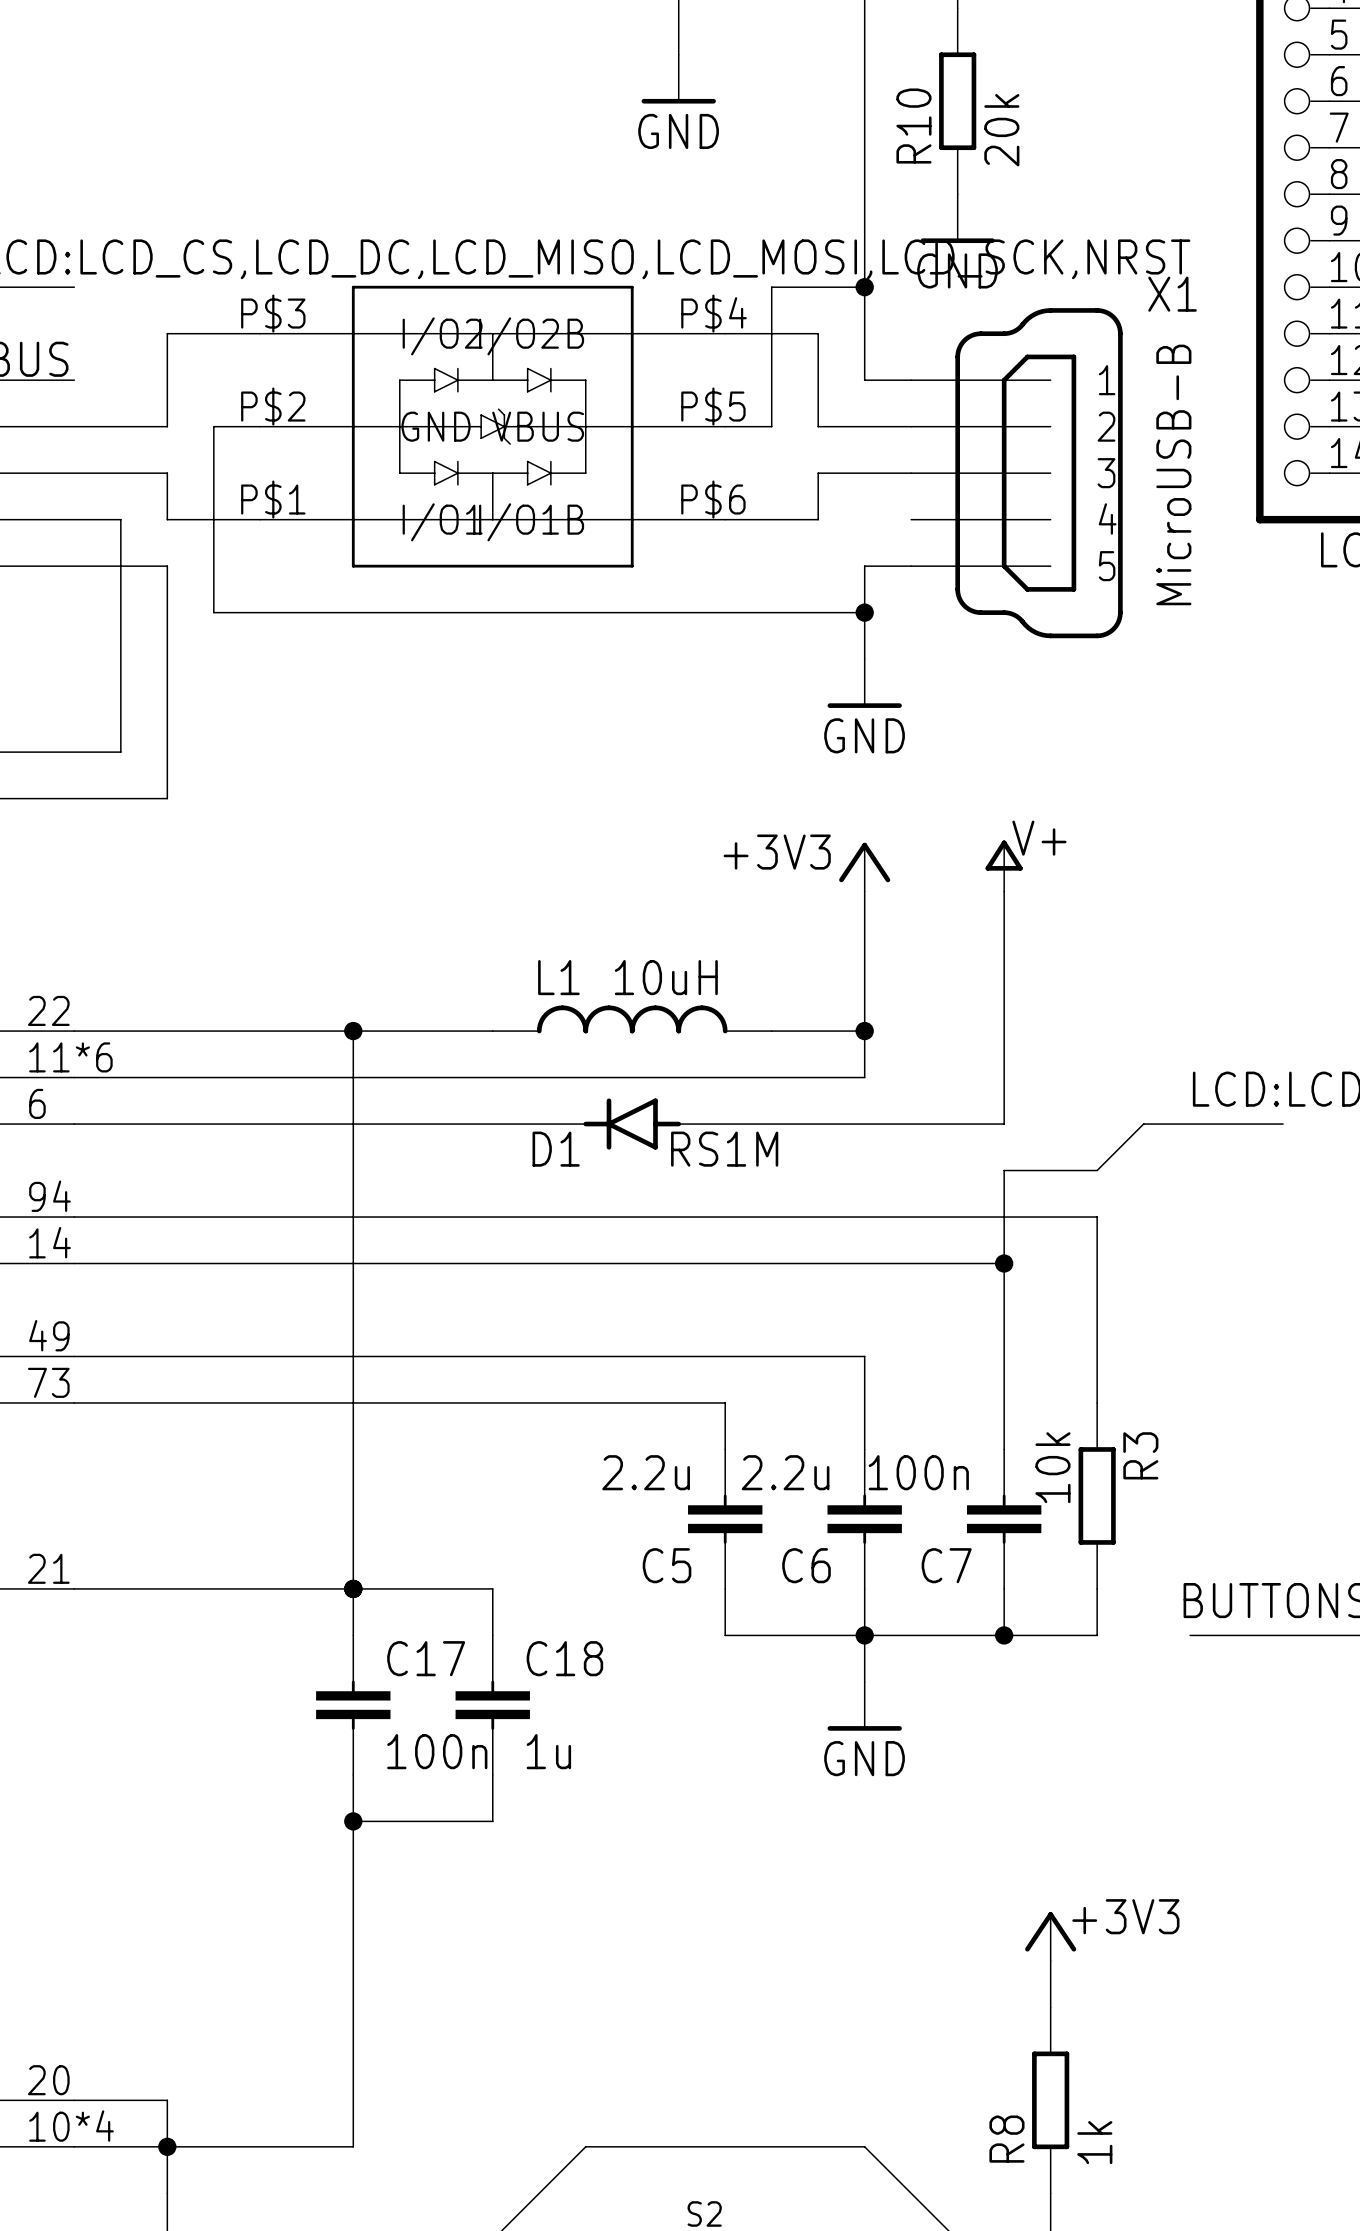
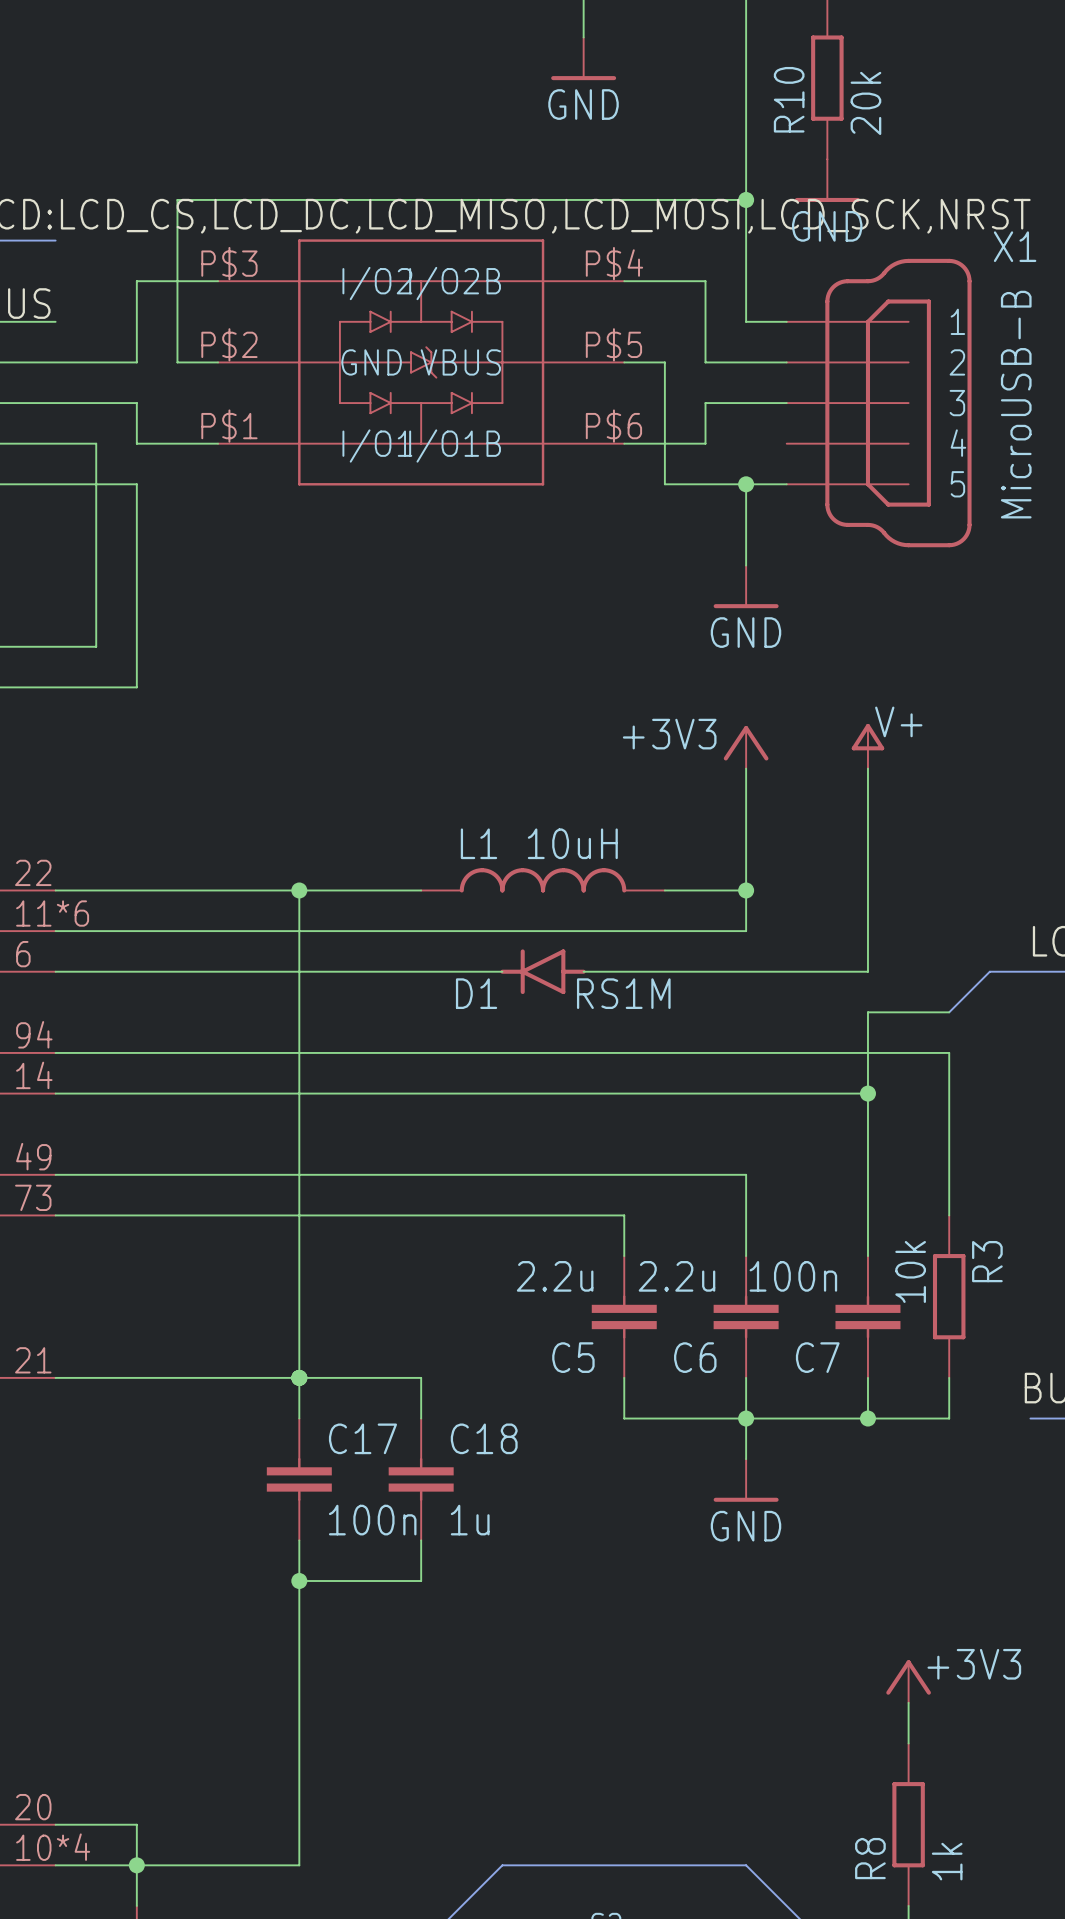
wire: (864, 287) (771, 287) (771, 426) -> (746, 484) (664, 484) (664, 362)
junction position: (864, 287) -> (746, 199)
wire: (213, 426) (213, 612) (864, 612) -> (177, 362) (177, 199) (746, 199)
junction position: (864, 612) -> (746, 484)

